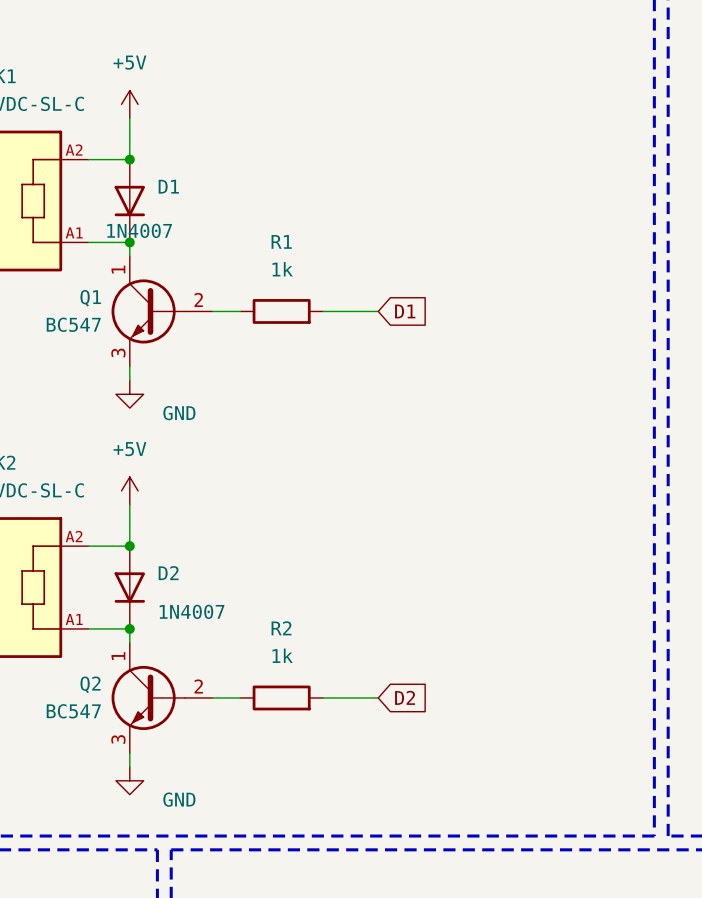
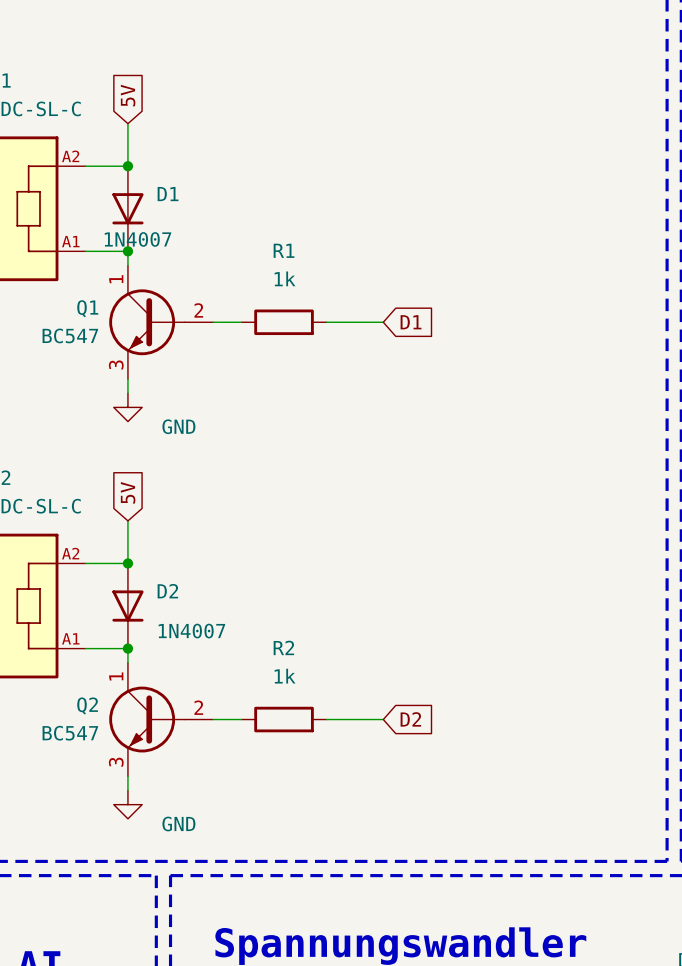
global label: none -> 5V (128, 95)
power symbol: +5V (129, 104) -> none
global label: none -> 5V (128, 492)
power symbol: +5V (129, 490) -> none

